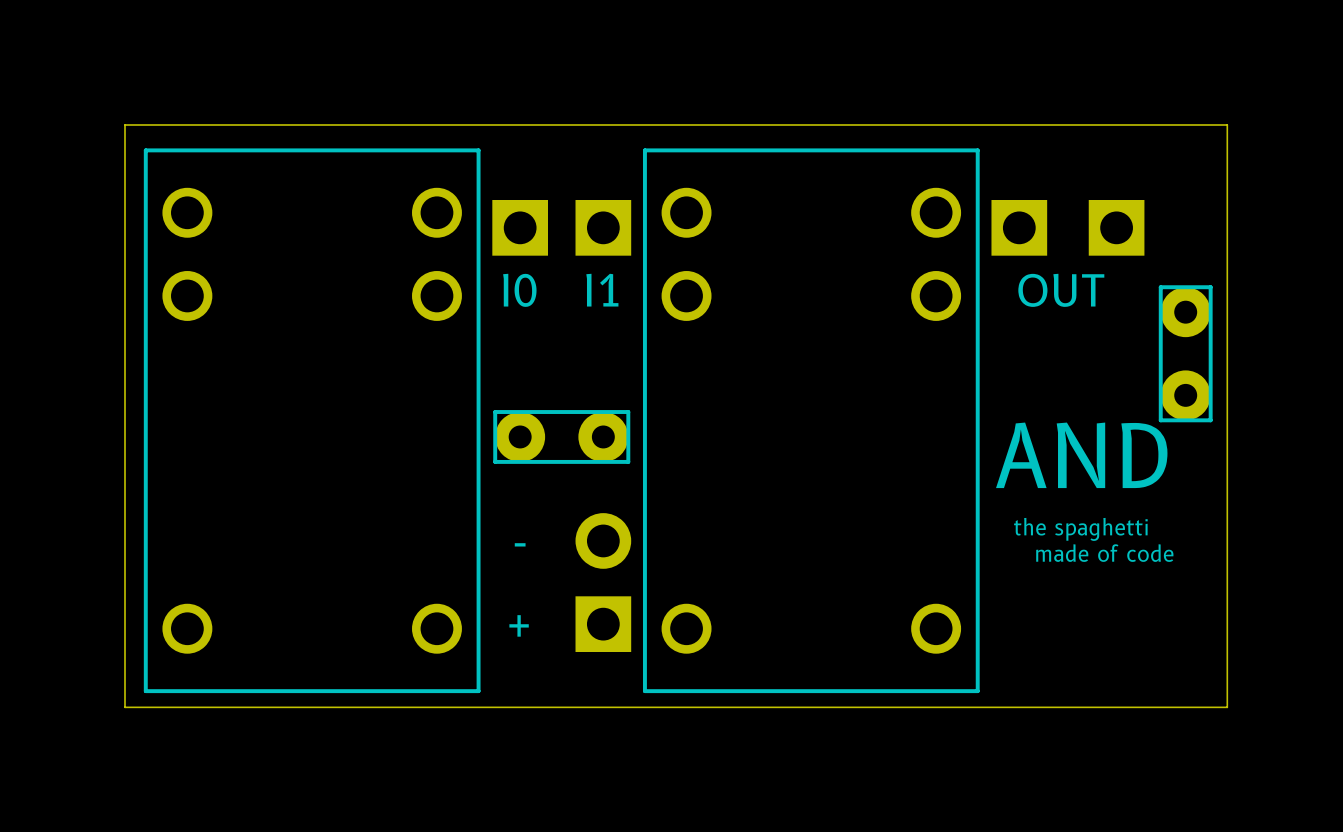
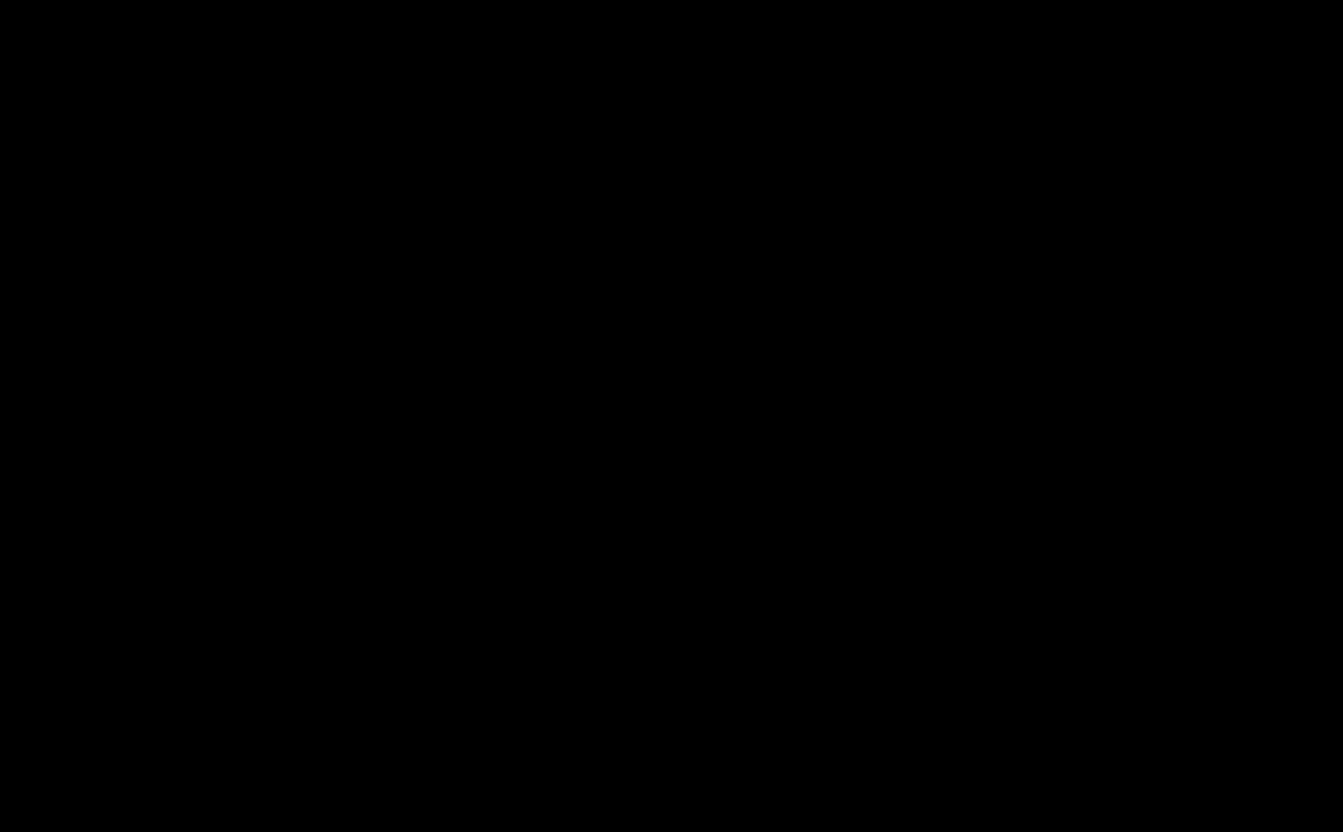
board edge: (124, 124) (124, 707) (1227, 707) (1227, 124) (124, 124) -> none
part: (520, 227) -> none
part: (603, 227) -> none
part: (1019, 227) -> none
part: (1116, 227) -> none
text: I0 (519, 290) -> none
text: I1 (602, 290) -> none
text: OUT (1061, 290) -> none
part: (1185, 353) -> none
part: (312, 420) -> none
part: (811, 420) -> none
part: (561, 436) -> none
text: AND (1081, 455) -> none
text: the spaghetti (1080, 529) -> none
text: - (520, 544) -> none
text: made of code (1104, 553) -> none
part: (603, 582) -> none
text: + (519, 625) -> none

